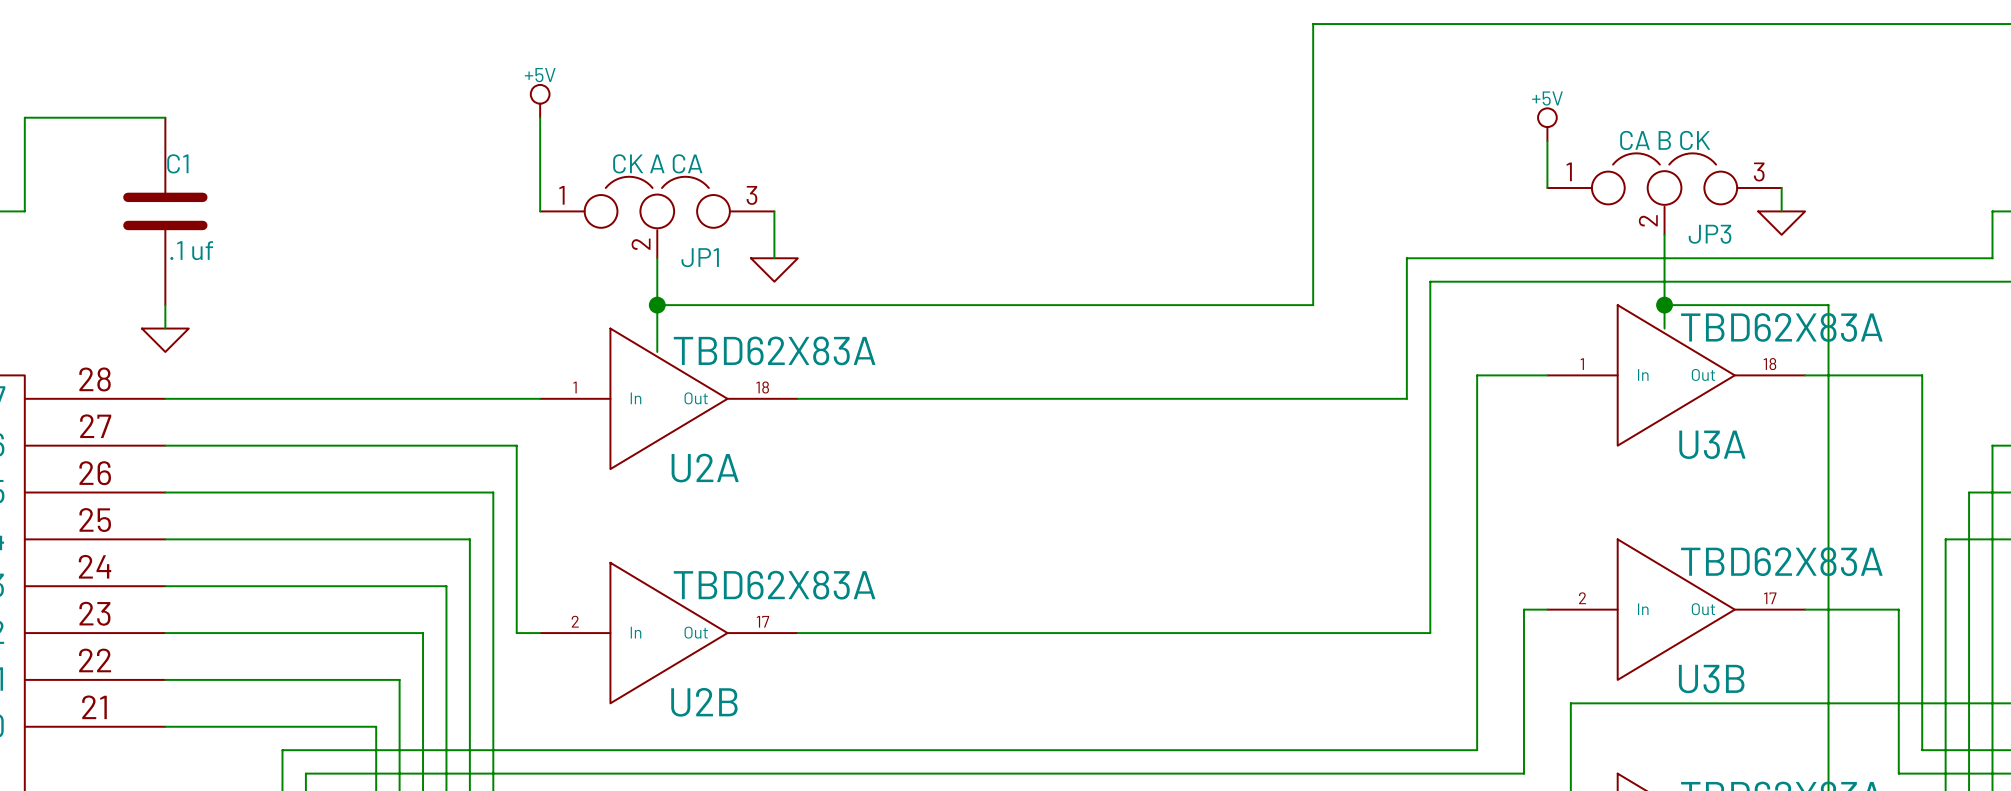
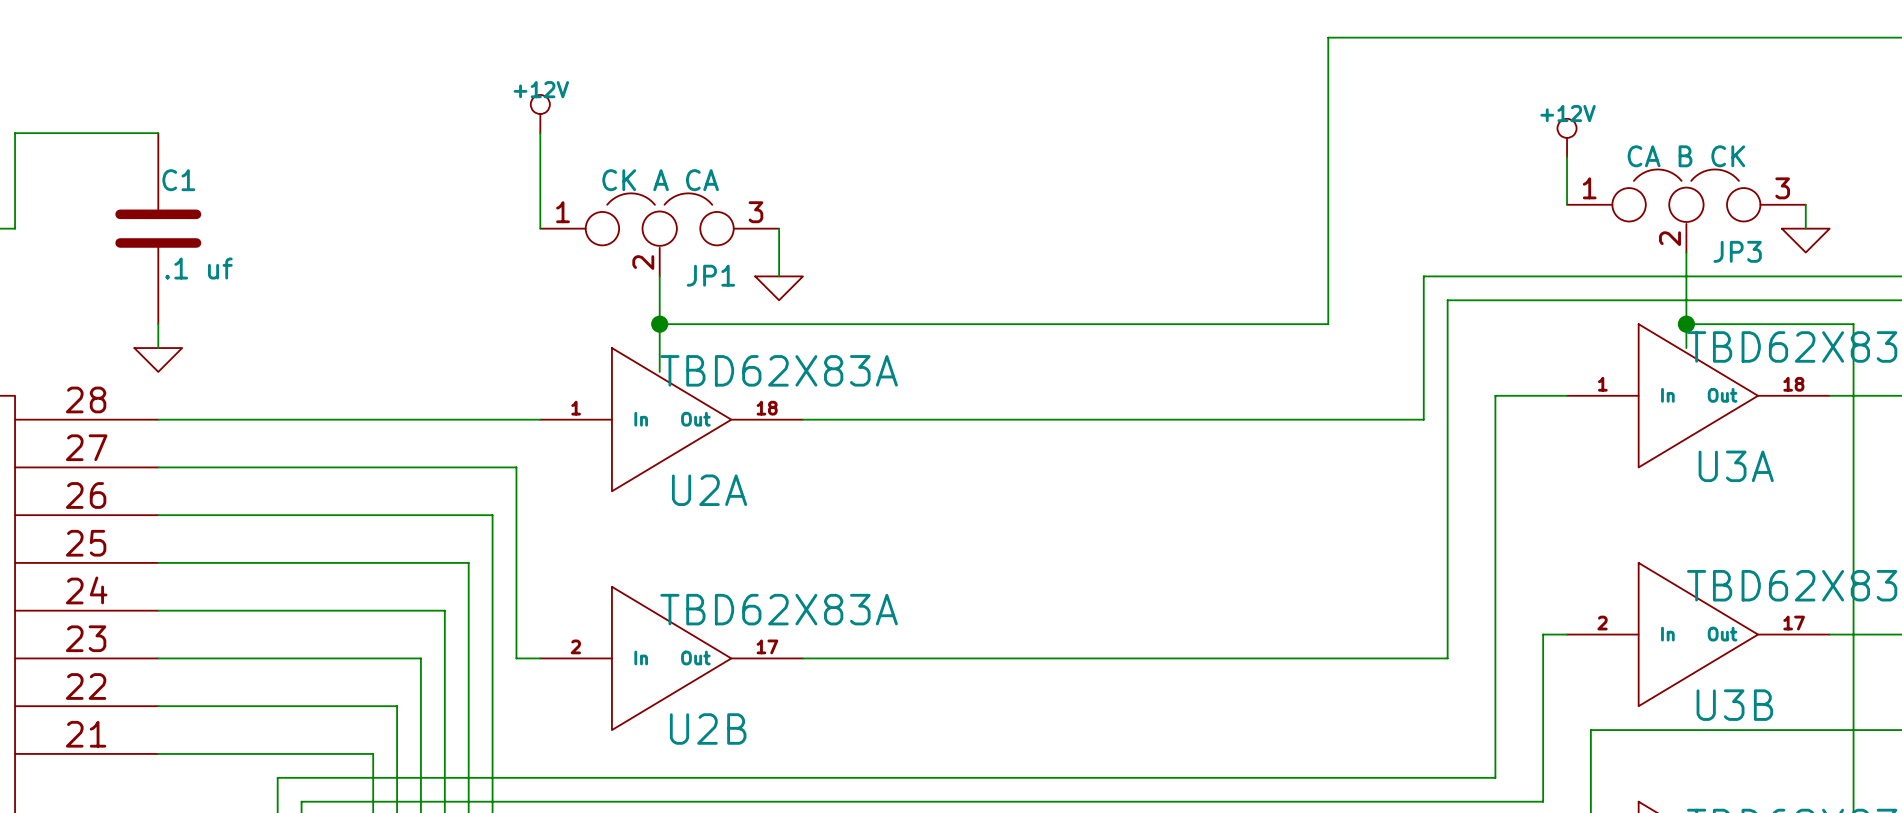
power symbol: +5V (540, 101) -> +12V (540, 114)
power symbol: +5V (1547, 124) -> +12V (1567, 137)

